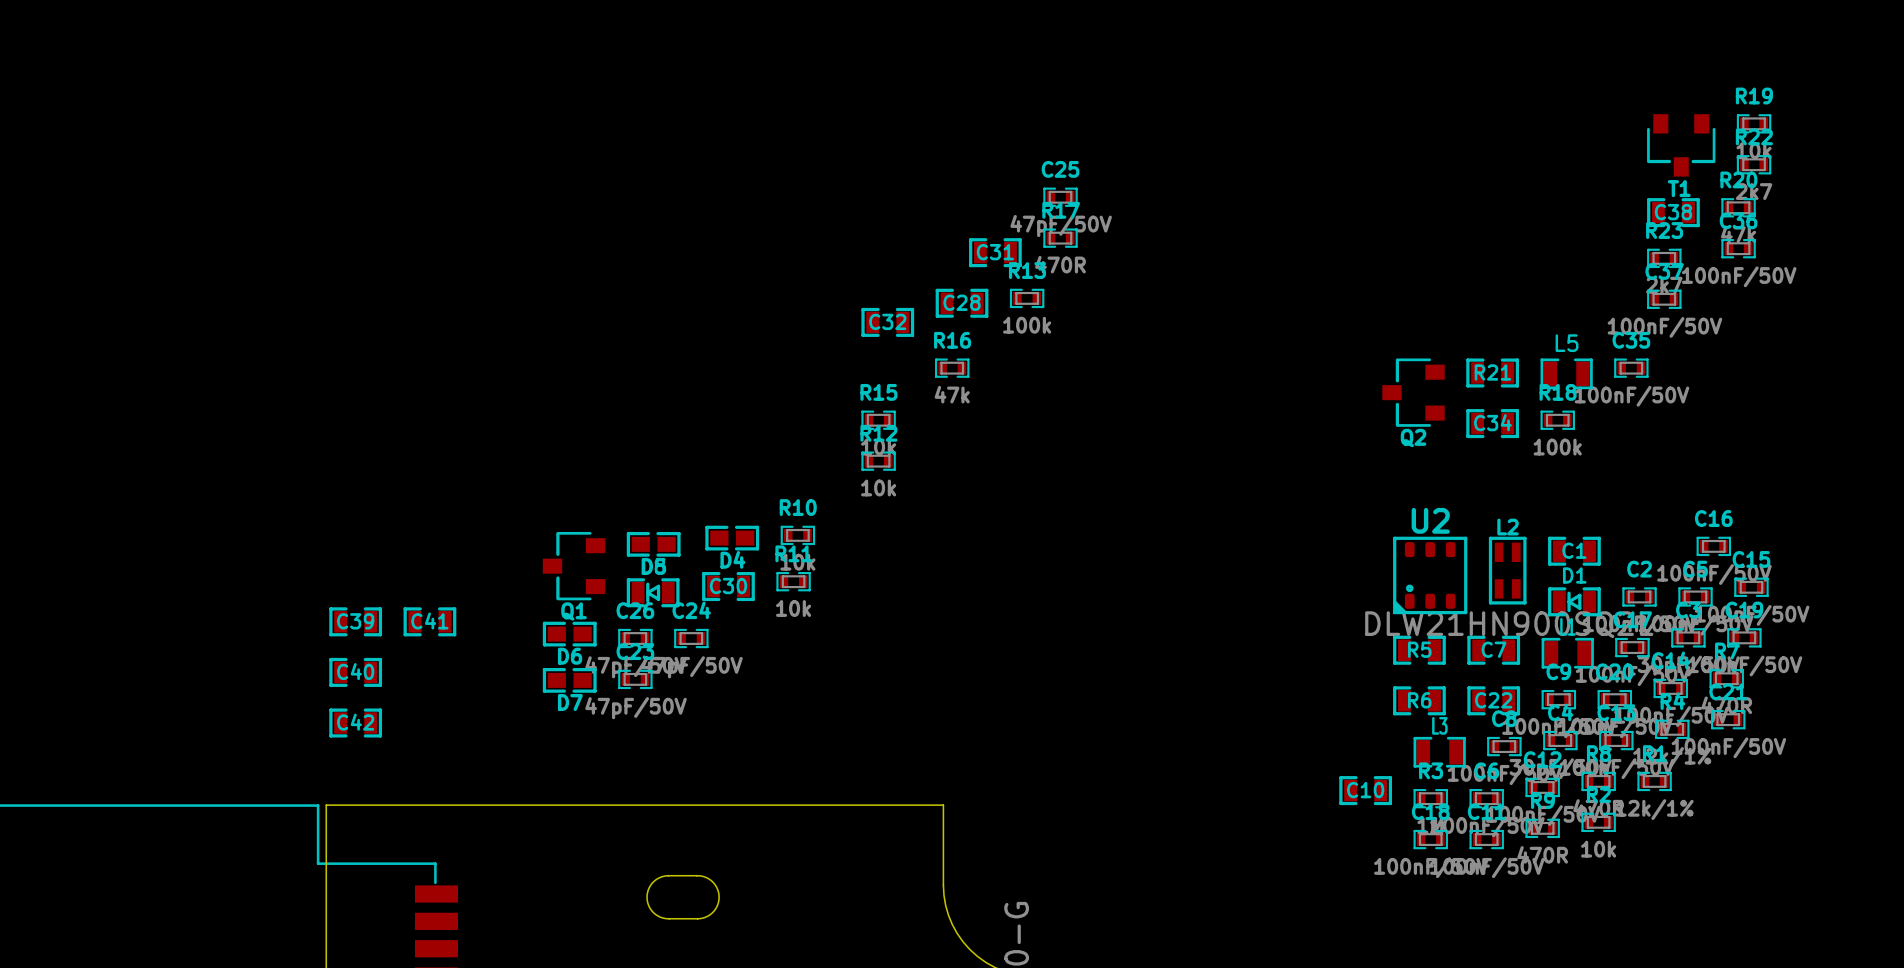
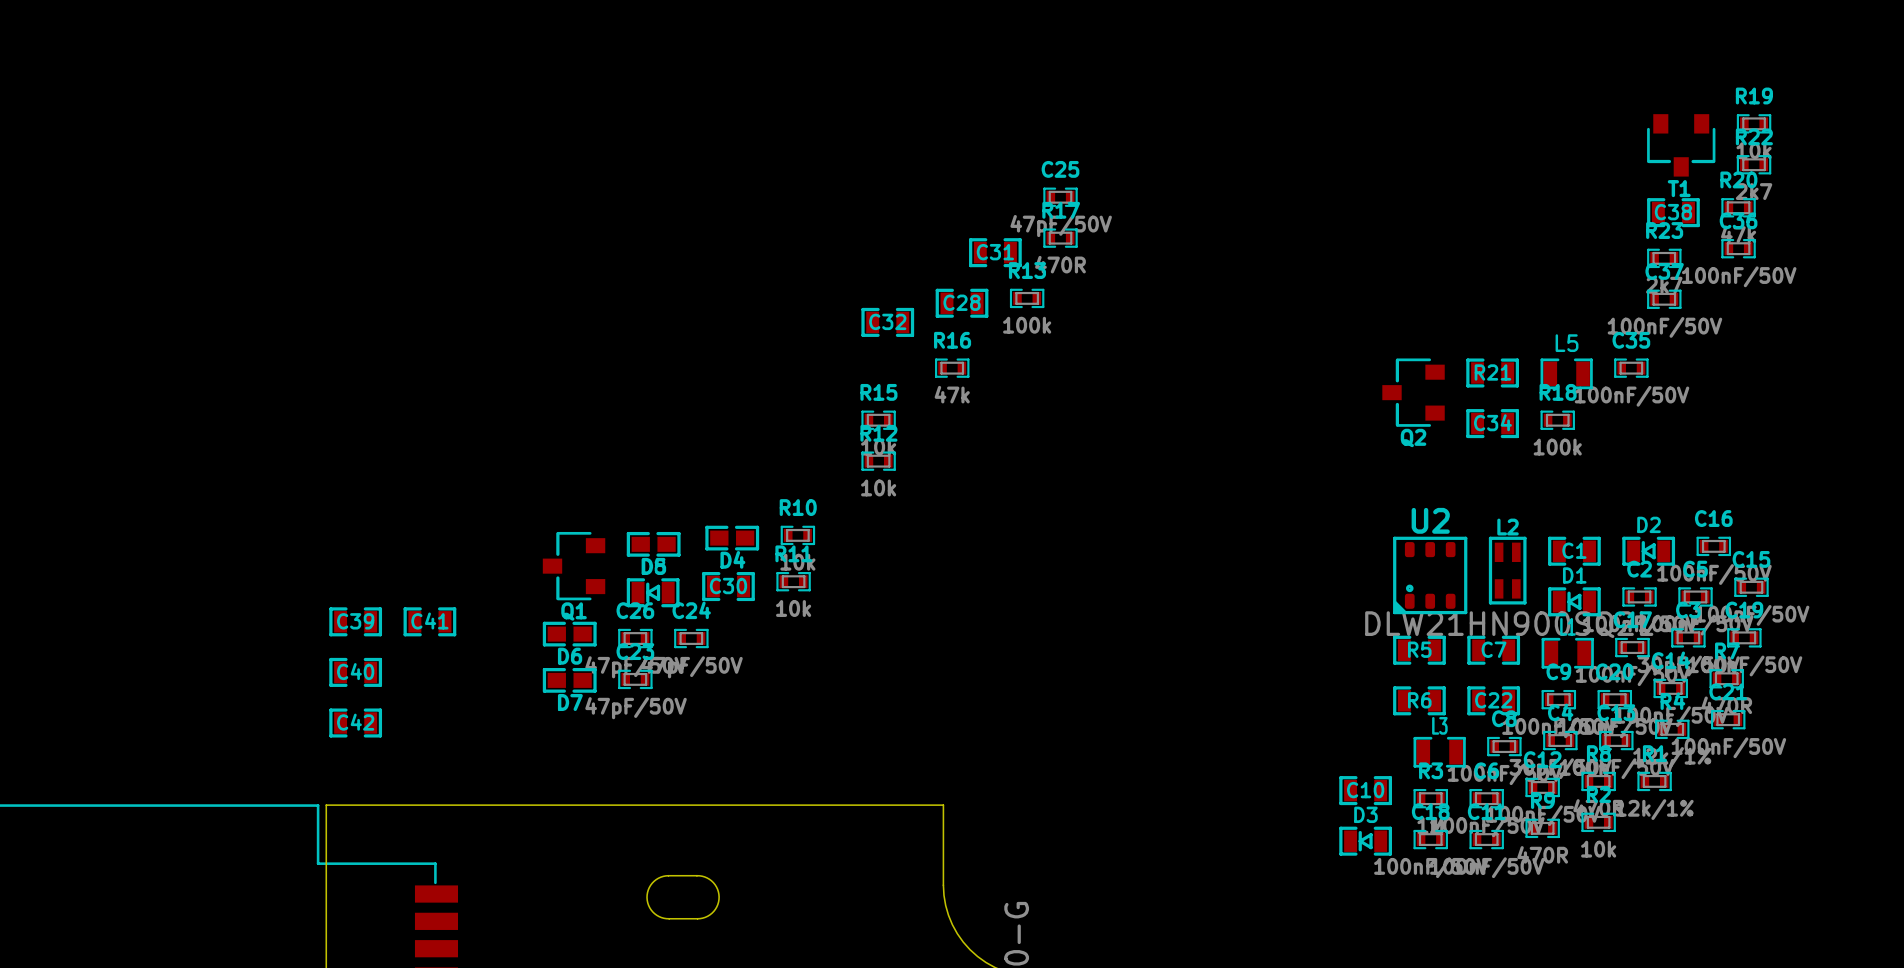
D2: none -> (1648, 551)
D3: none -> (1365, 841)

